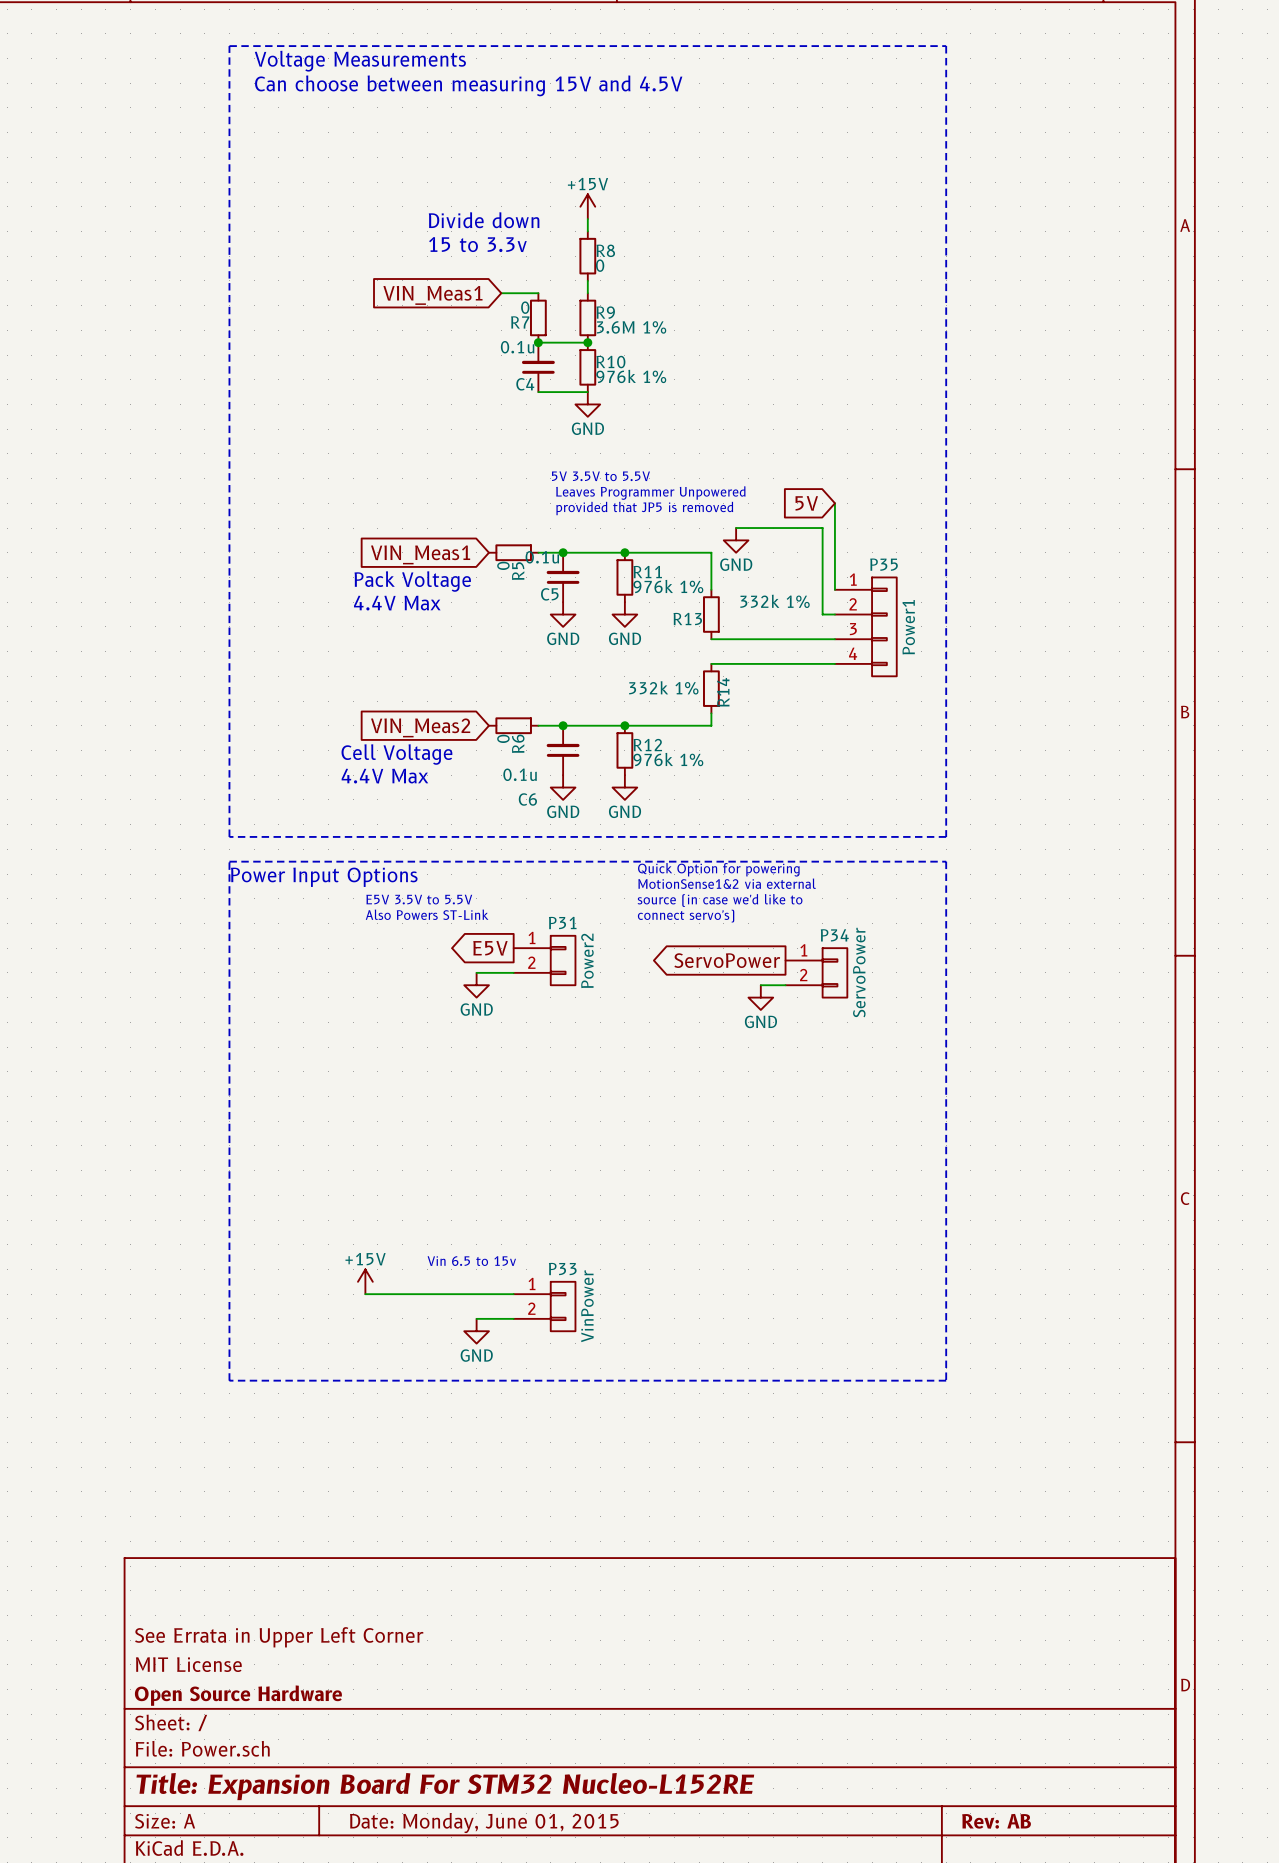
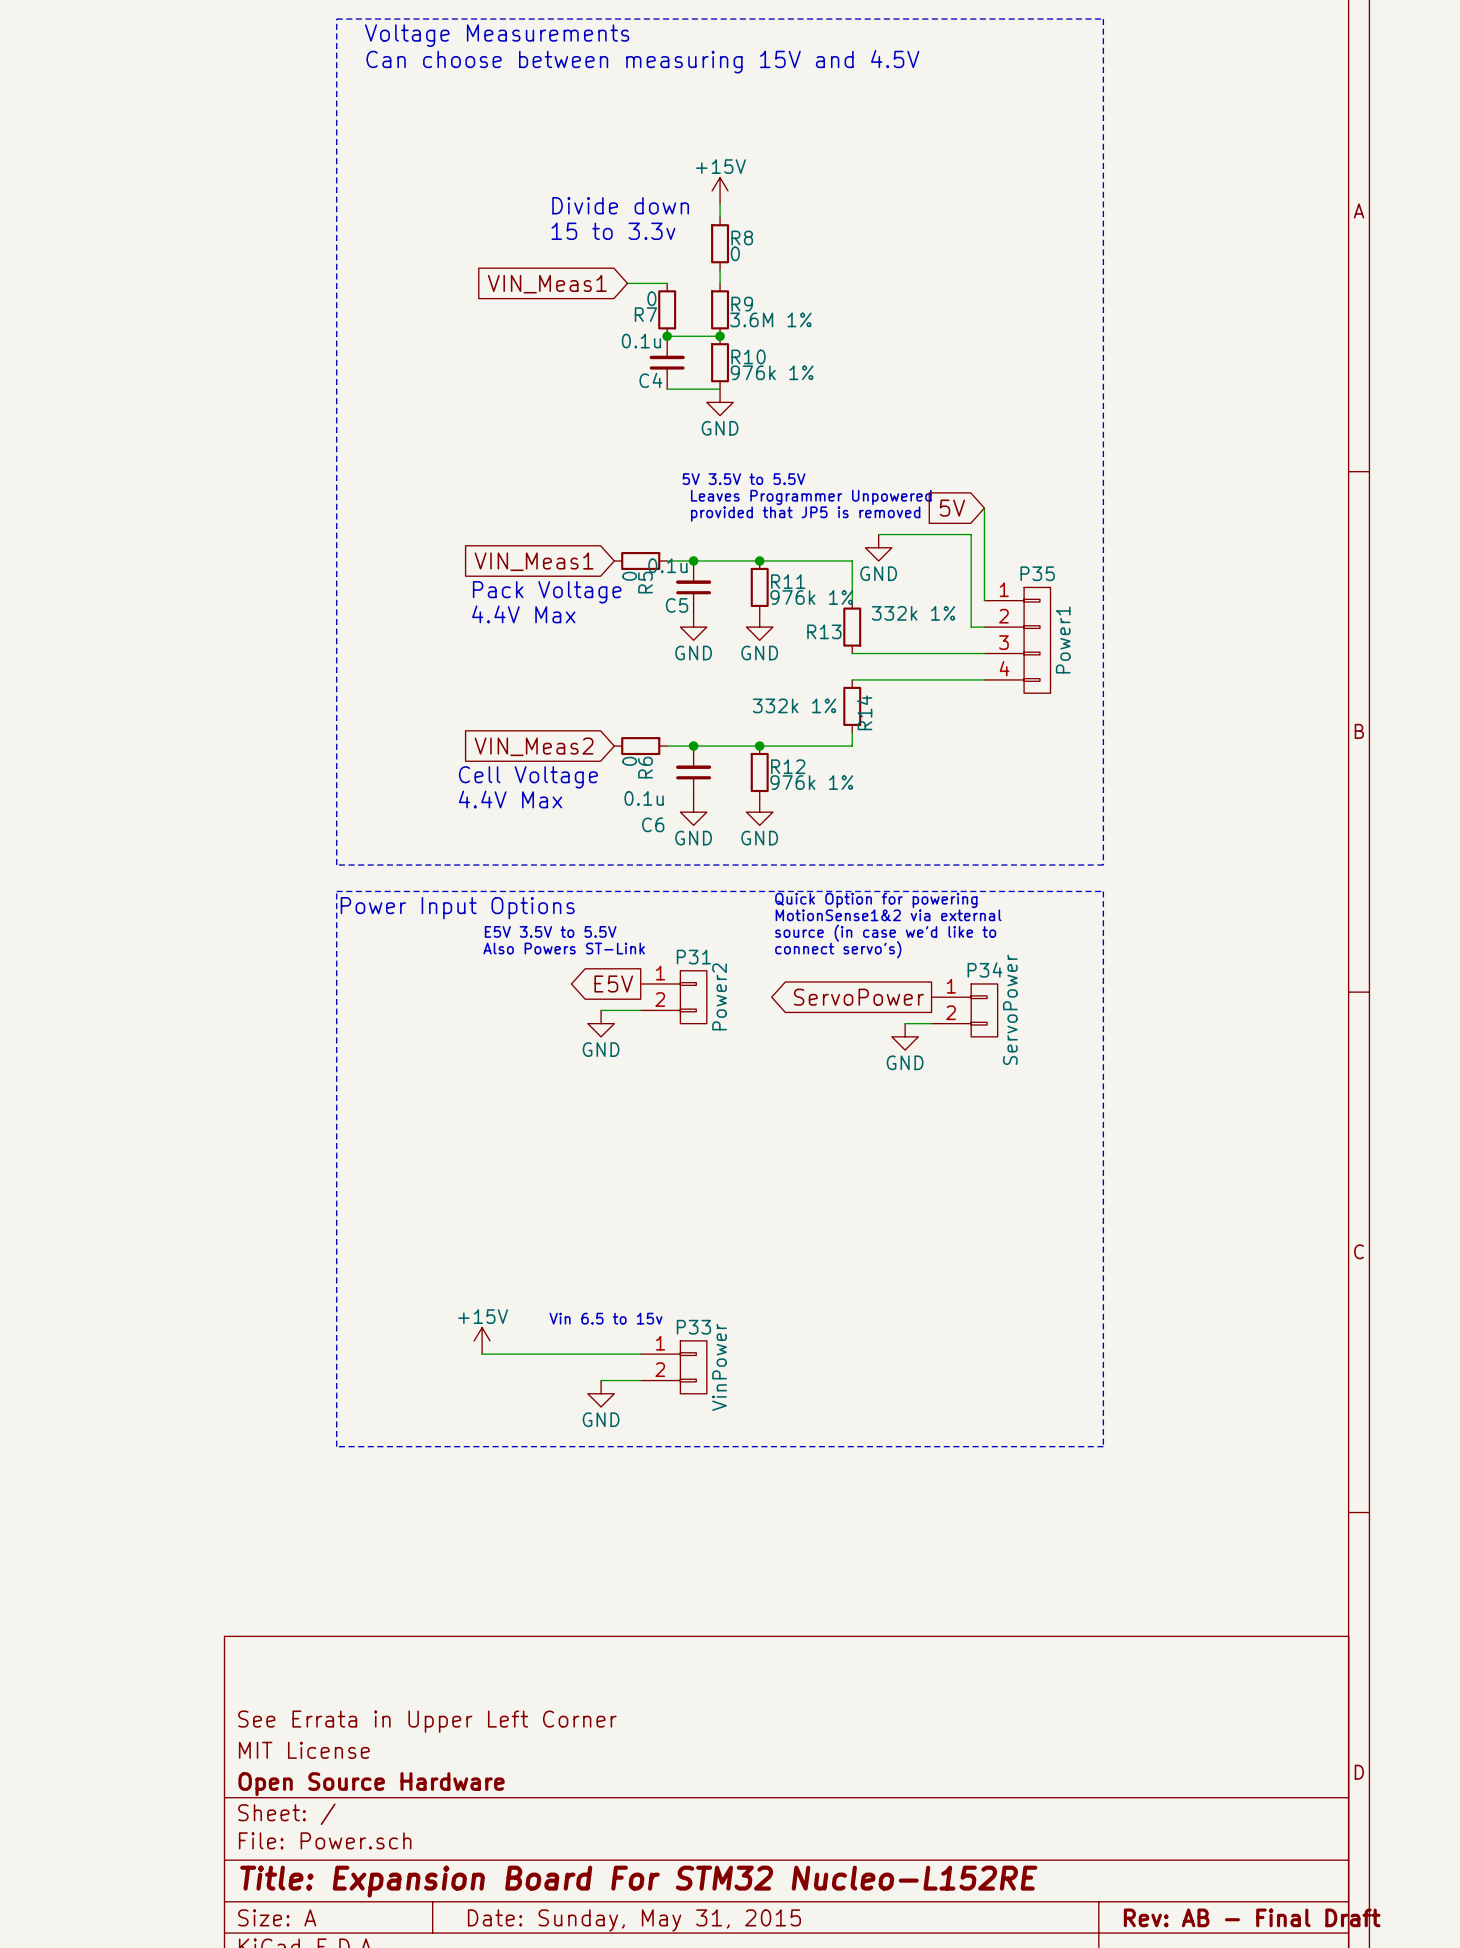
title block: Rev: AB (996, 1821) -> Rev: AB - Final Draft (1252, 1917)
title block: Date: Monday, June 01, 2015 (484, 1823) -> Date: Sunday, May 31, 2015 (634, 1920)

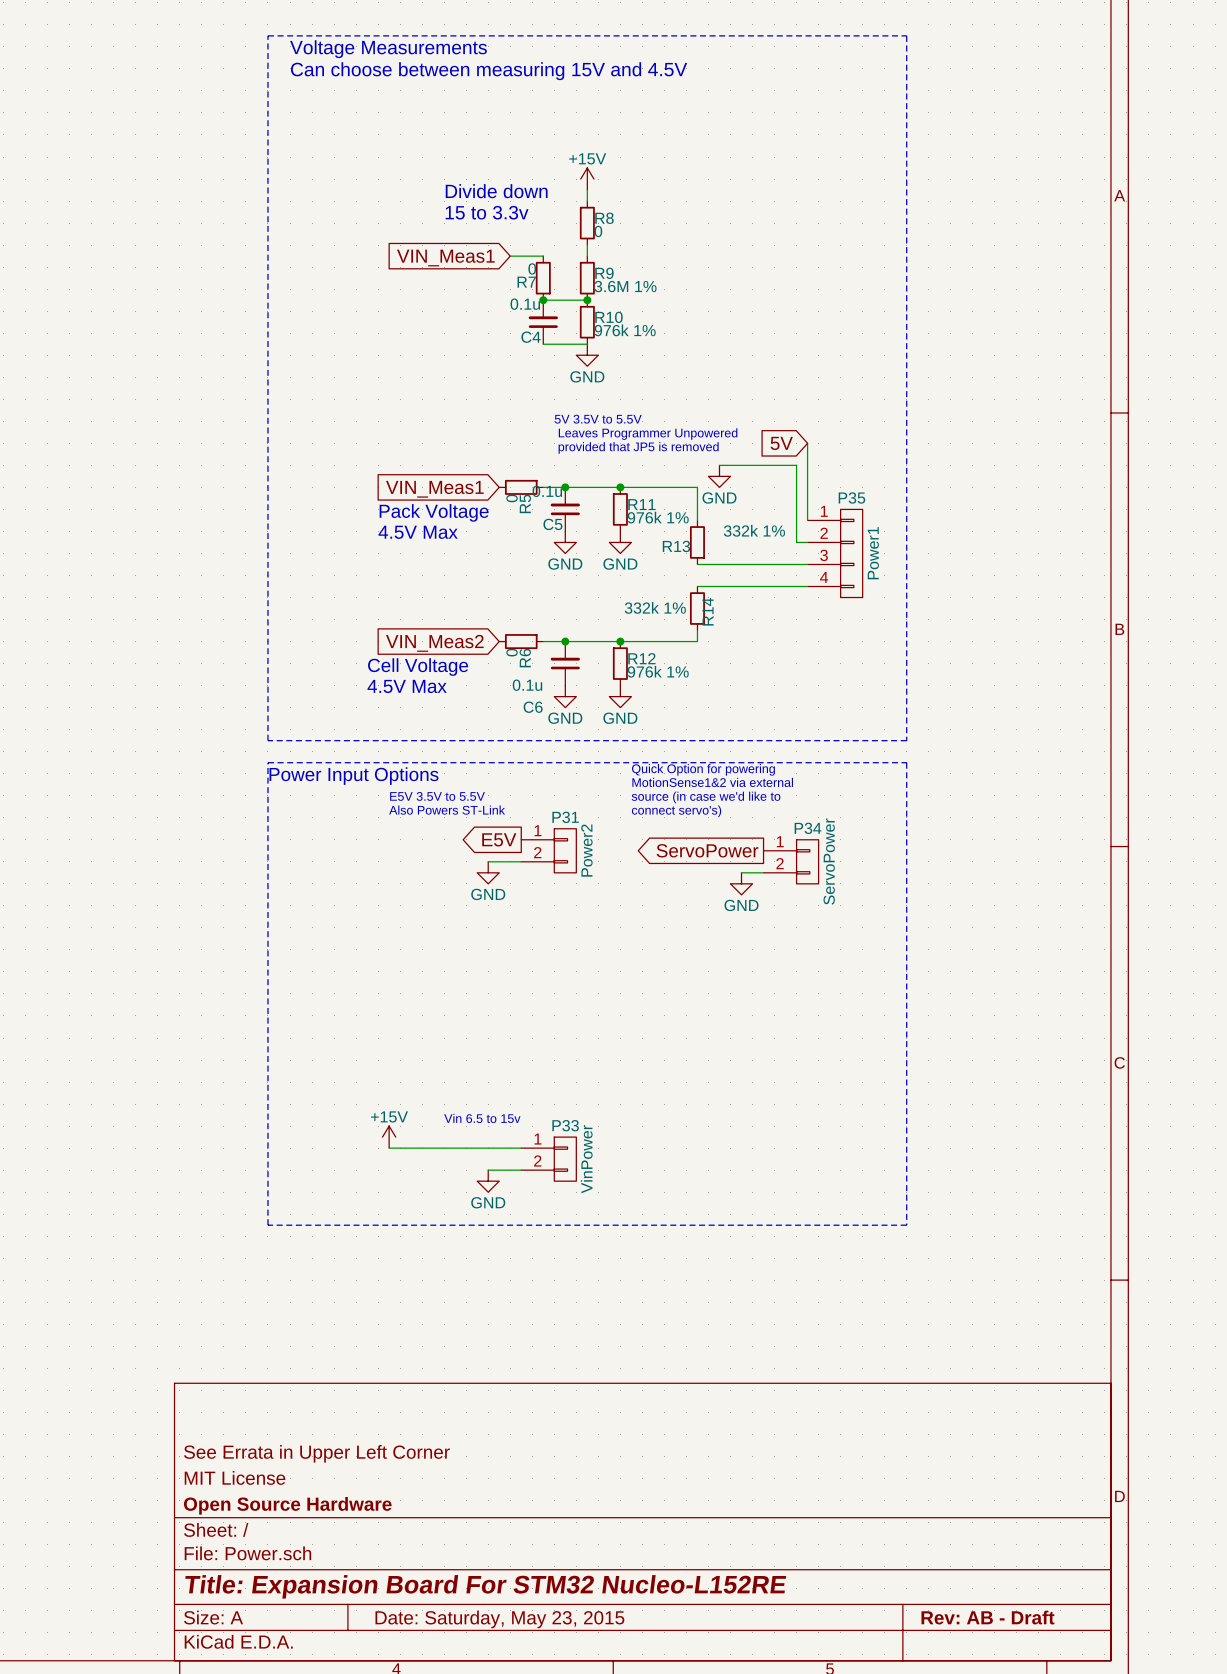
text: 4.4V Max (523, 614) -> 4.5V Max (418, 532)
text: 4.4V Max (510, 799) -> 4.5V Max (407, 686)
title block: Rev: AB - Final Draft (1252, 1917) -> Rev: AB - Draft (987, 1617)
title block: Date: Sunday, May 31, 2015 (634, 1920) -> Date: Saturday, May 23, 2015 (499, 1619)

